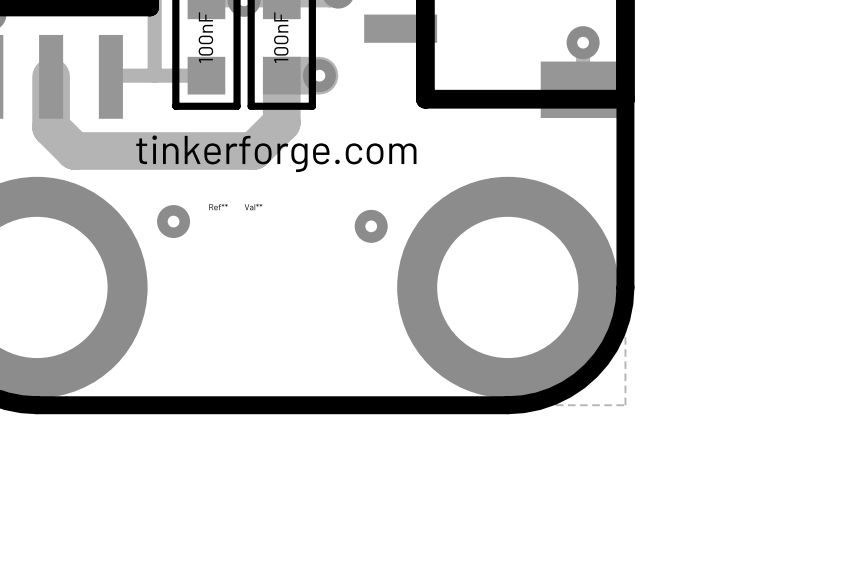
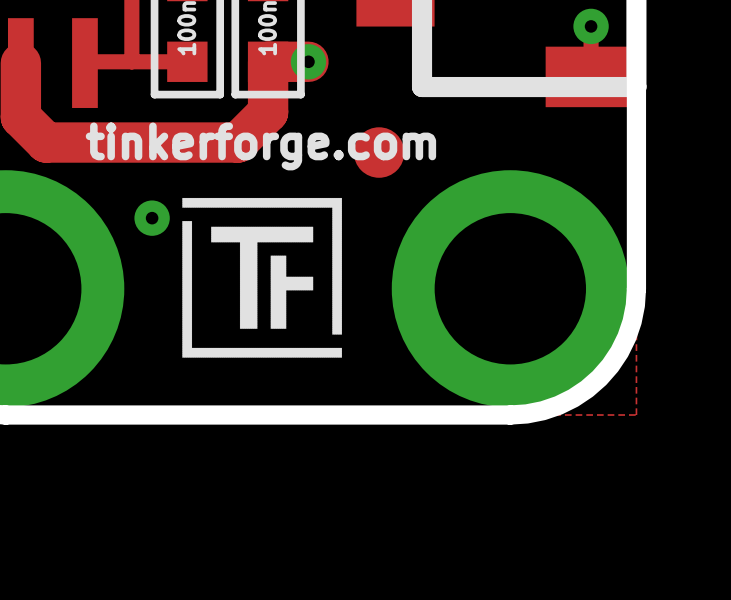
part: none -> (379, 152)
drawing: none -> [182, 197, 342, 358]
via: (371, 226) -> none

